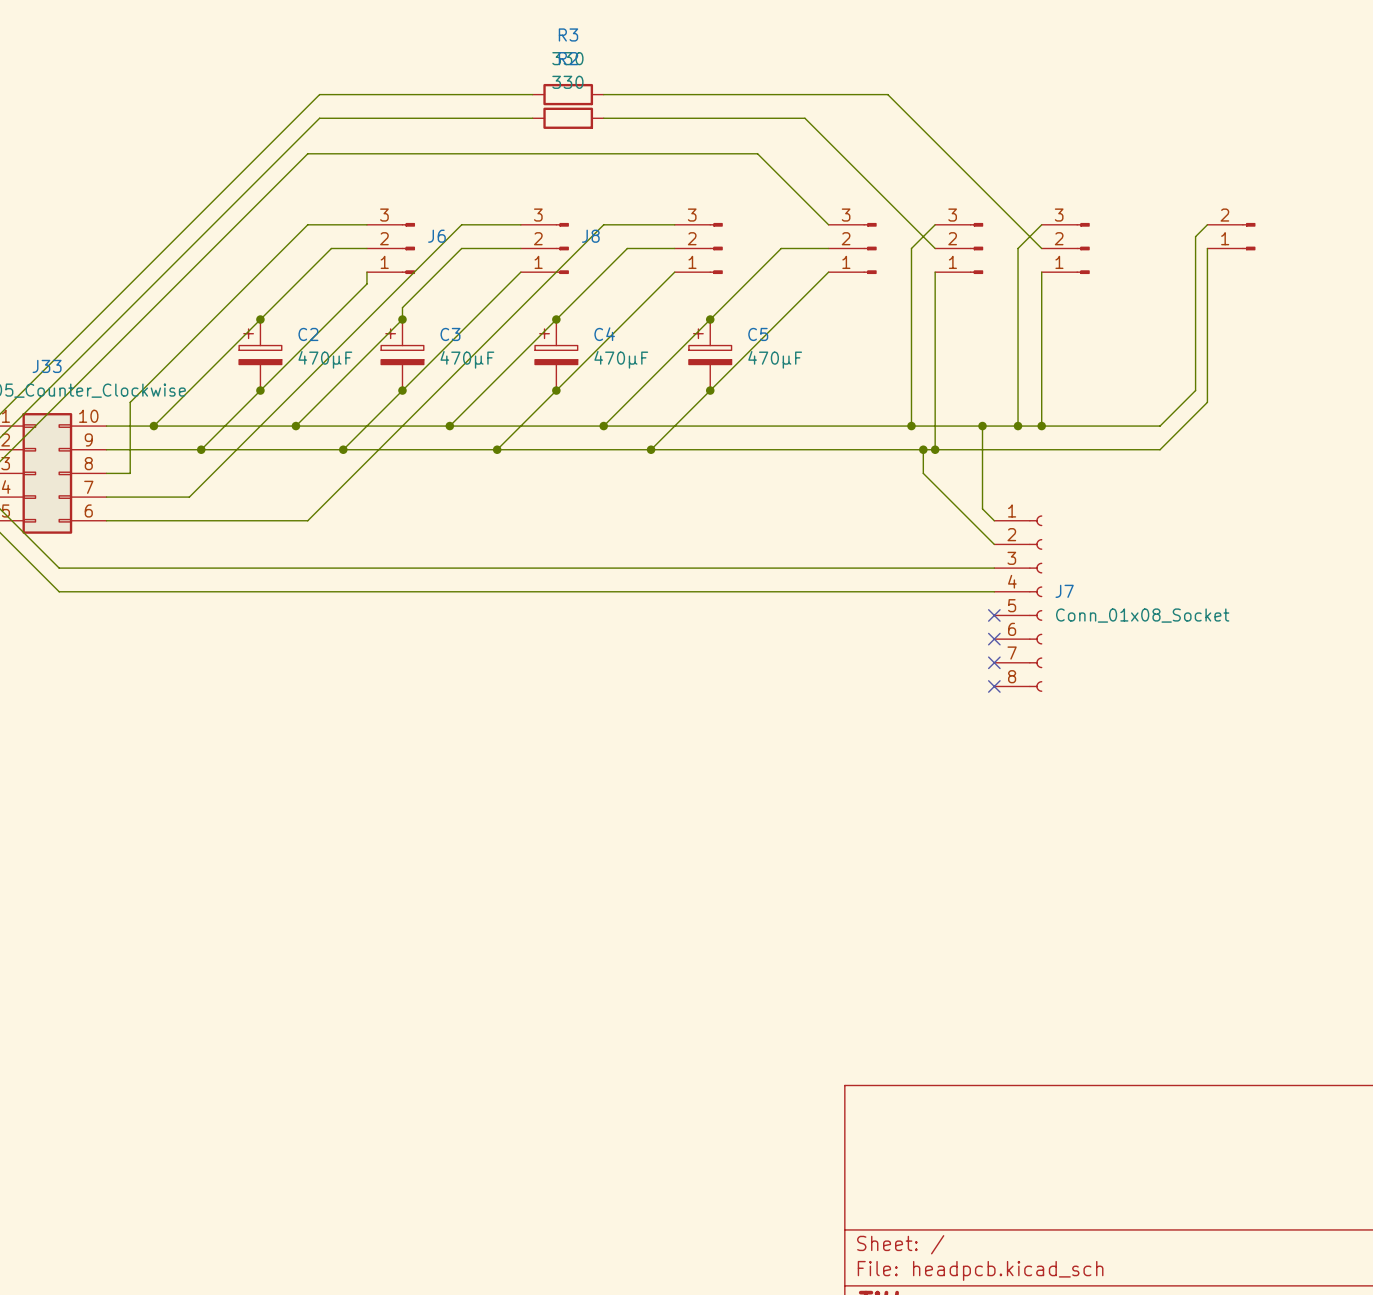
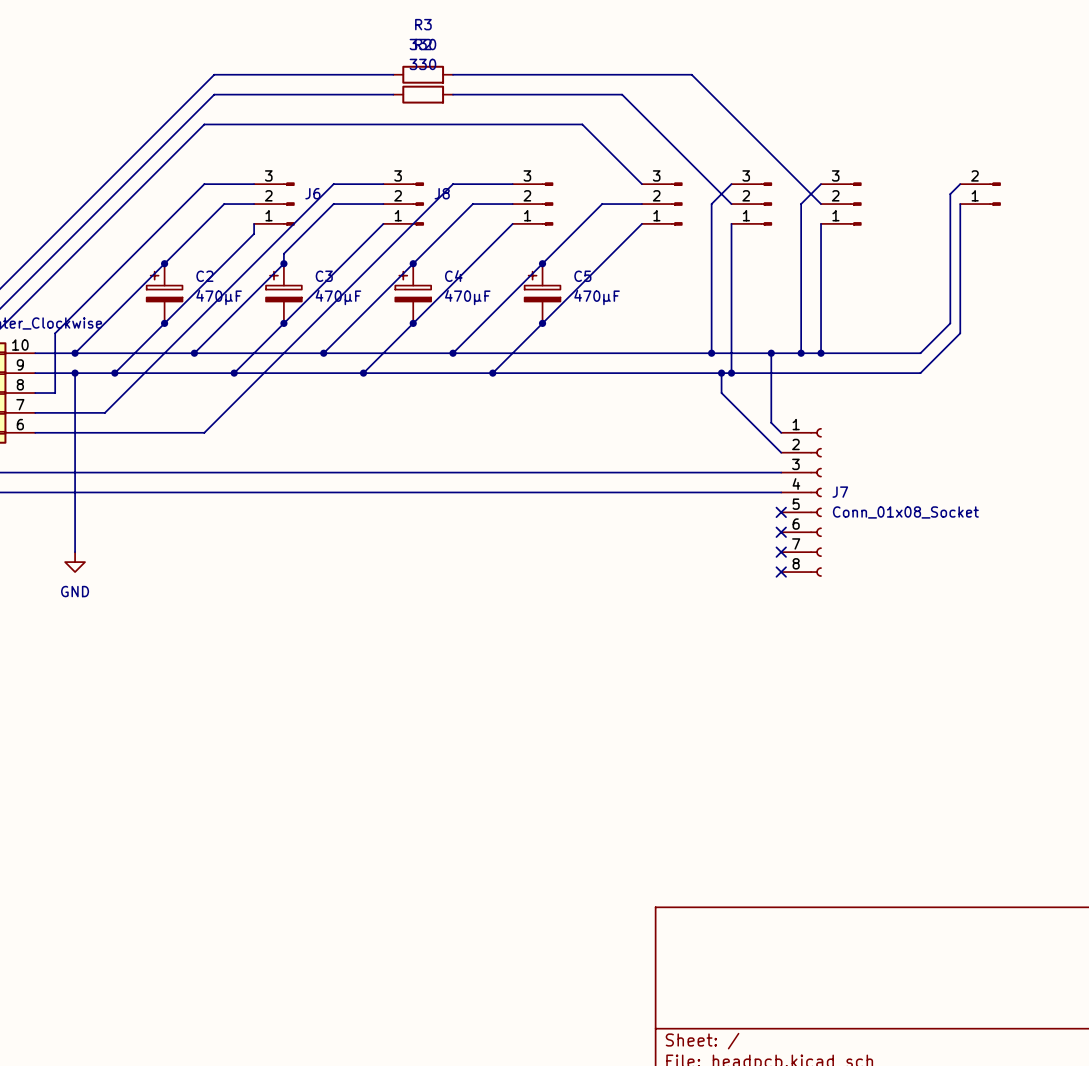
wire: none -> (75, 373) (75, 552)
junction: none -> (75, 373)
power symbol: none -> GND (75, 562)

